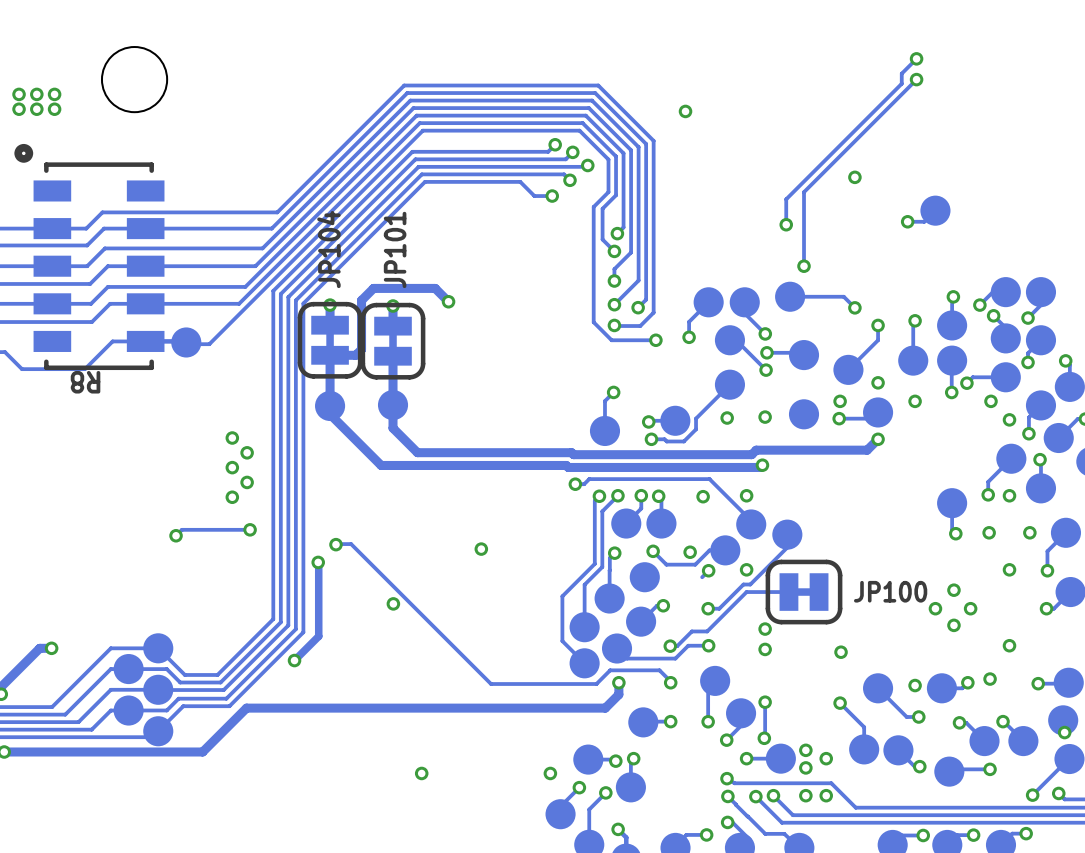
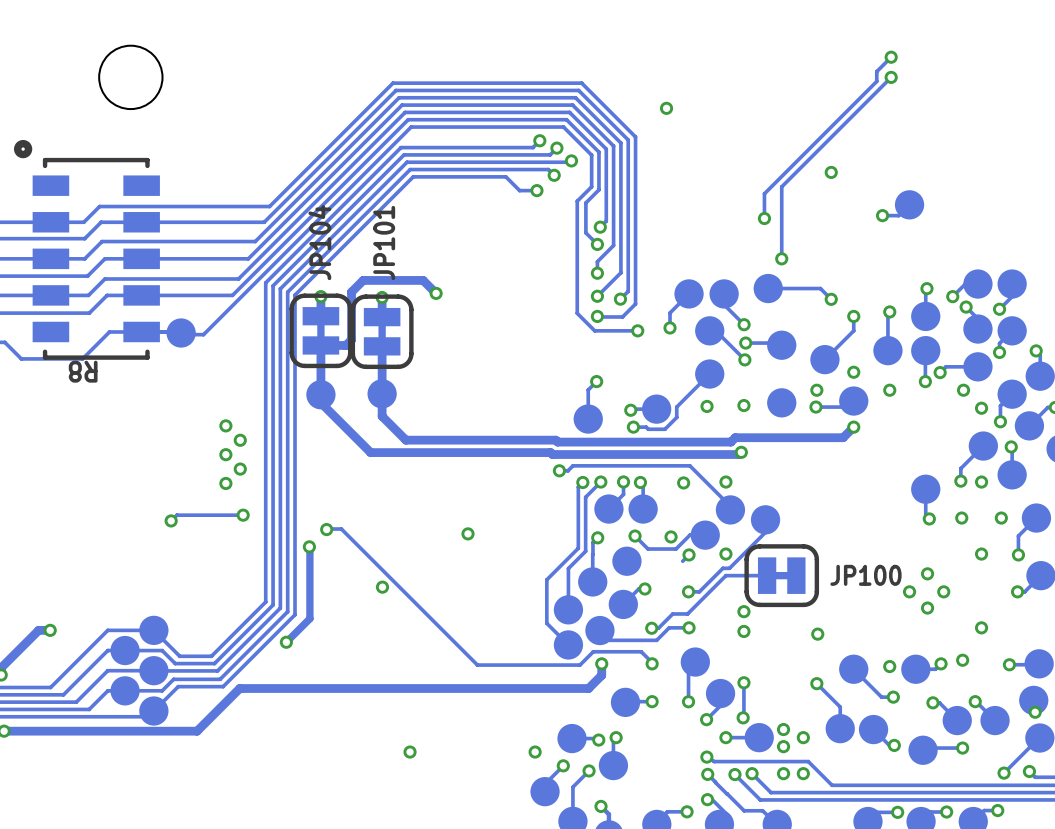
via: (19, 94) -> none
via: (36, 94) -> none
via: (54, 94) -> none
via: (19, 109) -> none
via: (36, 109) -> none
via: (54, 109) -> none

